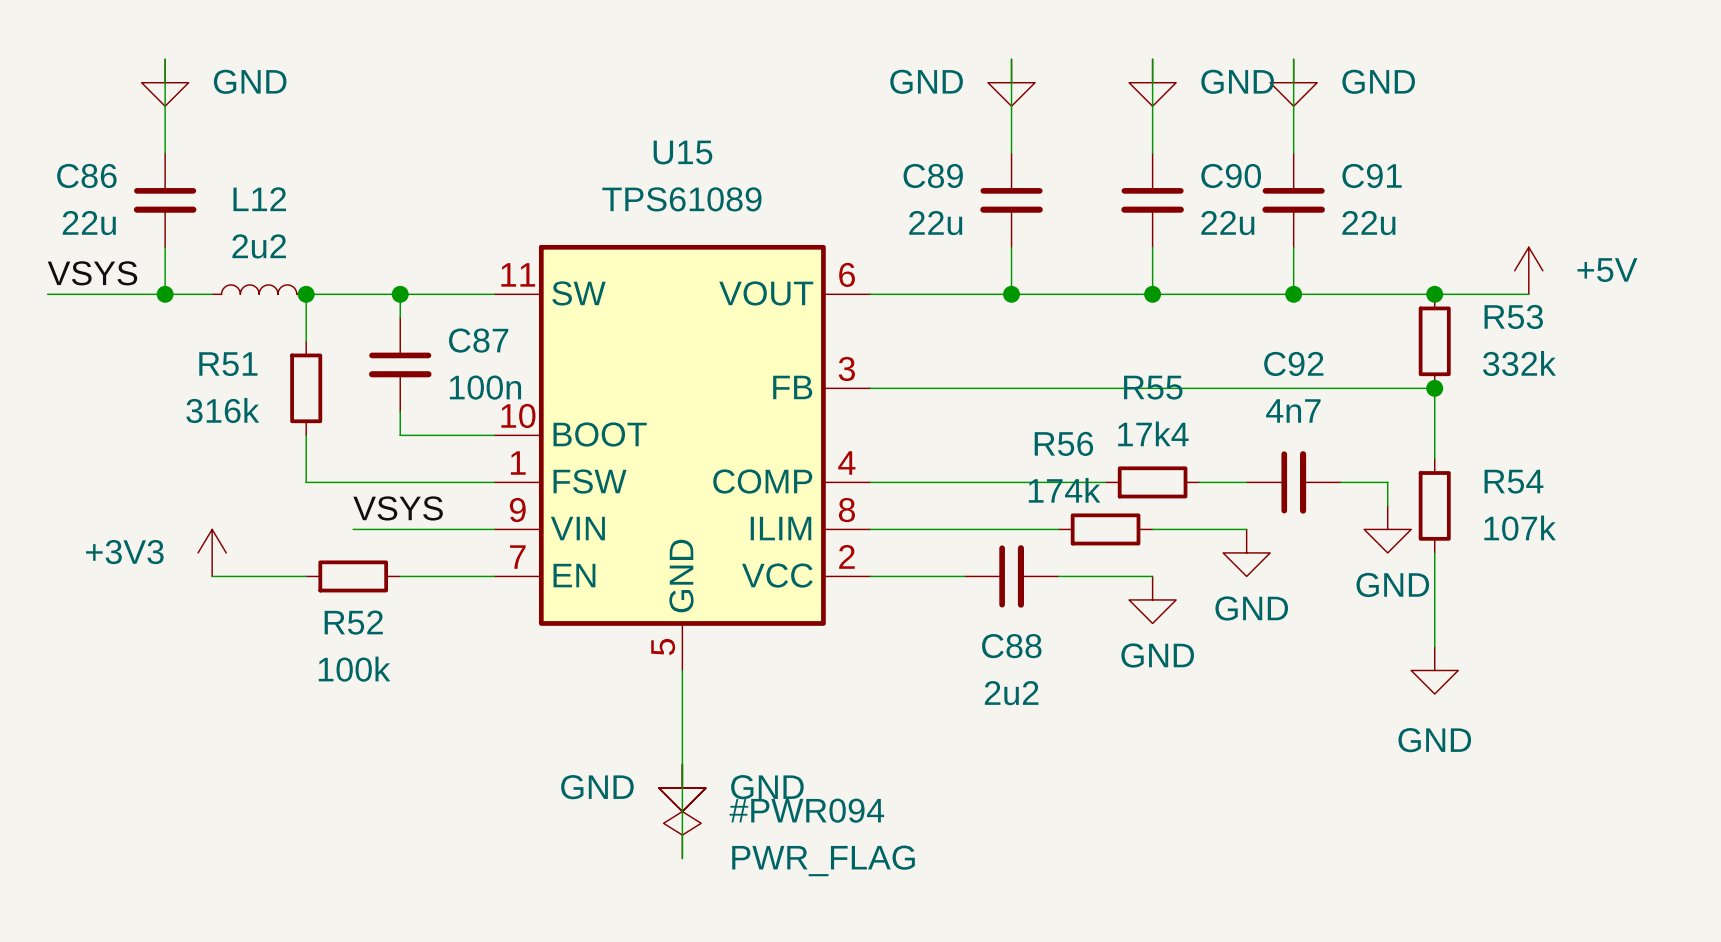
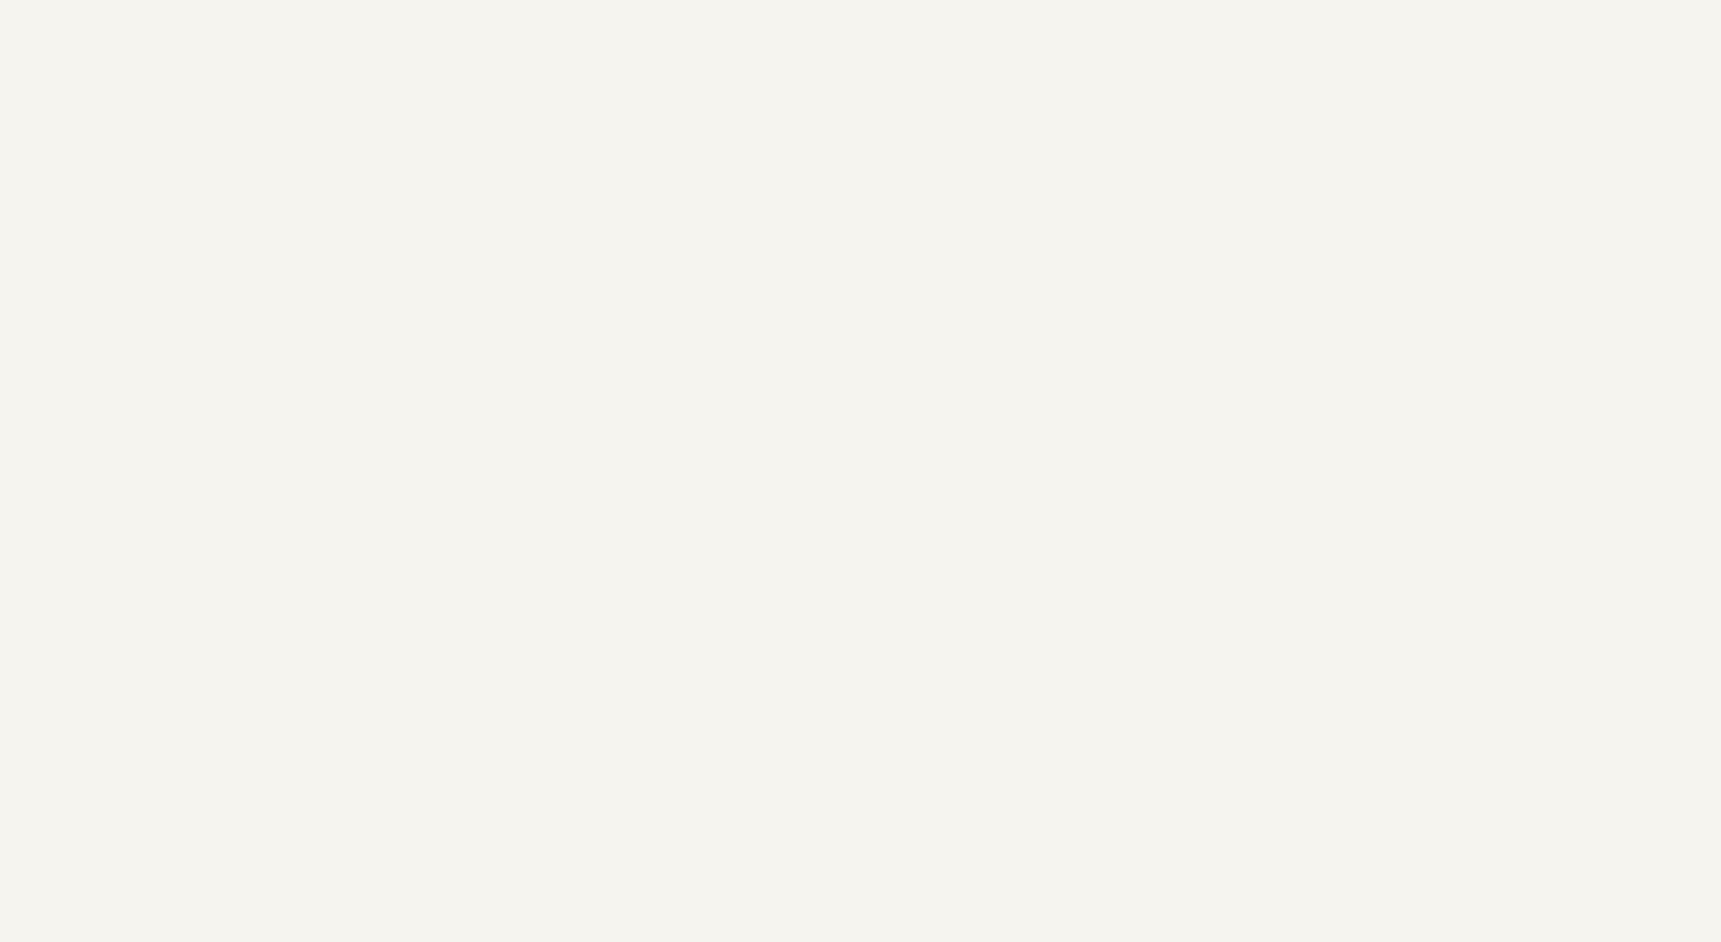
wire: (165, 59) (165, 153) -> none
wire: (1011, 59) (1011, 153) -> none
wire: (1152, 59) (1152, 153) -> none
wire: (1293, 59) (1293, 153) -> none
power symbol: GND (165, 82) -> none
power symbol: GND (1011, 82) -> none
power symbol: GND (1152, 82) -> none
power symbol: GND (1293, 82) -> none
C86: 22u (165, 200) -> none
C89: 22u (1011, 200) -> none
C90: 22u (1152, 200) -> none
C91: 22u (1293, 200) -> none
wire: (165, 247) (165, 294) -> none
wire: (1011, 247) (1011, 294) -> none
wire: (1152, 247) (1152, 294) -> none
wire: (1293, 247) (1293, 294) -> none
power symbol: +5V (1528, 270) -> none
label: VSYS (92, 273) -> none
L12: 2u2 (259, 289) -> none
wire: (47, 294) (212, 294) -> none
junction: (165, 294) -> none
junction: (306, 294) -> none
wire: (400, 294) (400, 317) -> none
junction: (400, 294) -> none
wire: (494, 294) (306, 294) (306, 341) -> none
wire: (870, 294) (1528, 294) -> none
junction: (1011, 294) -> none
junction: (1152, 294) -> none
junction: (1293, 294) -> none
junction: (1434, 294) -> none
R53: 332k (1434, 341) -> none
C87: 100n (400, 364) -> none
R51: 316k (306, 388) -> none
wire: (870, 388) (1434, 388) (1434, 458) -> none
junction: (1434, 388) -> none
wire: (400, 411) (400, 435) (494, 435) -> none
wire: (306, 435) (306, 482) (494, 482) -> none
U15: TPS61089 (682, 457) -> none
wire: (870, 482) (1105, 482) -> none
R55: 17k4 (1152, 482) -> none
wire: (1199, 482) (1246, 482) -> none
C92: 4n7 (1293, 482) -> none
wire: (1340, 482) (1387, 482) (1387, 505) -> none
R54: 107k (1434, 505) -> none
label: VSYS (398, 508) -> none
wire: (353, 529) (494, 529) -> none
wire: (870, 529) (1058, 529) -> none
R56: 174k (1105, 529) -> none
wire: (1152, 529) (1246, 529) -> none
power symbol: GND (1387, 529) -> none
power symbol: +3V3 (212, 552) -> none
power symbol: GND (1246, 552) -> none
wire: (1434, 552) (1434, 646) -> none
wire: (212, 576) (306, 576) -> none
R52: 100k (353, 576) -> none
wire: (400, 576) (494, 576) -> none
wire: (870, 576) (964, 576) -> none
C88: 2u2 (1011, 576) -> none
wire: (1058, 576) (1152, 576) -> none
power symbol: GND (1152, 599) -> none
wire: (682, 670) (682, 858) -> none
power symbol: GND (1434, 670) -> none
power symbol: GND (682, 788) -> none
power symbol: GND (682, 788) -> none
#PWR094: PWR_FLAG (682, 835) -> none

